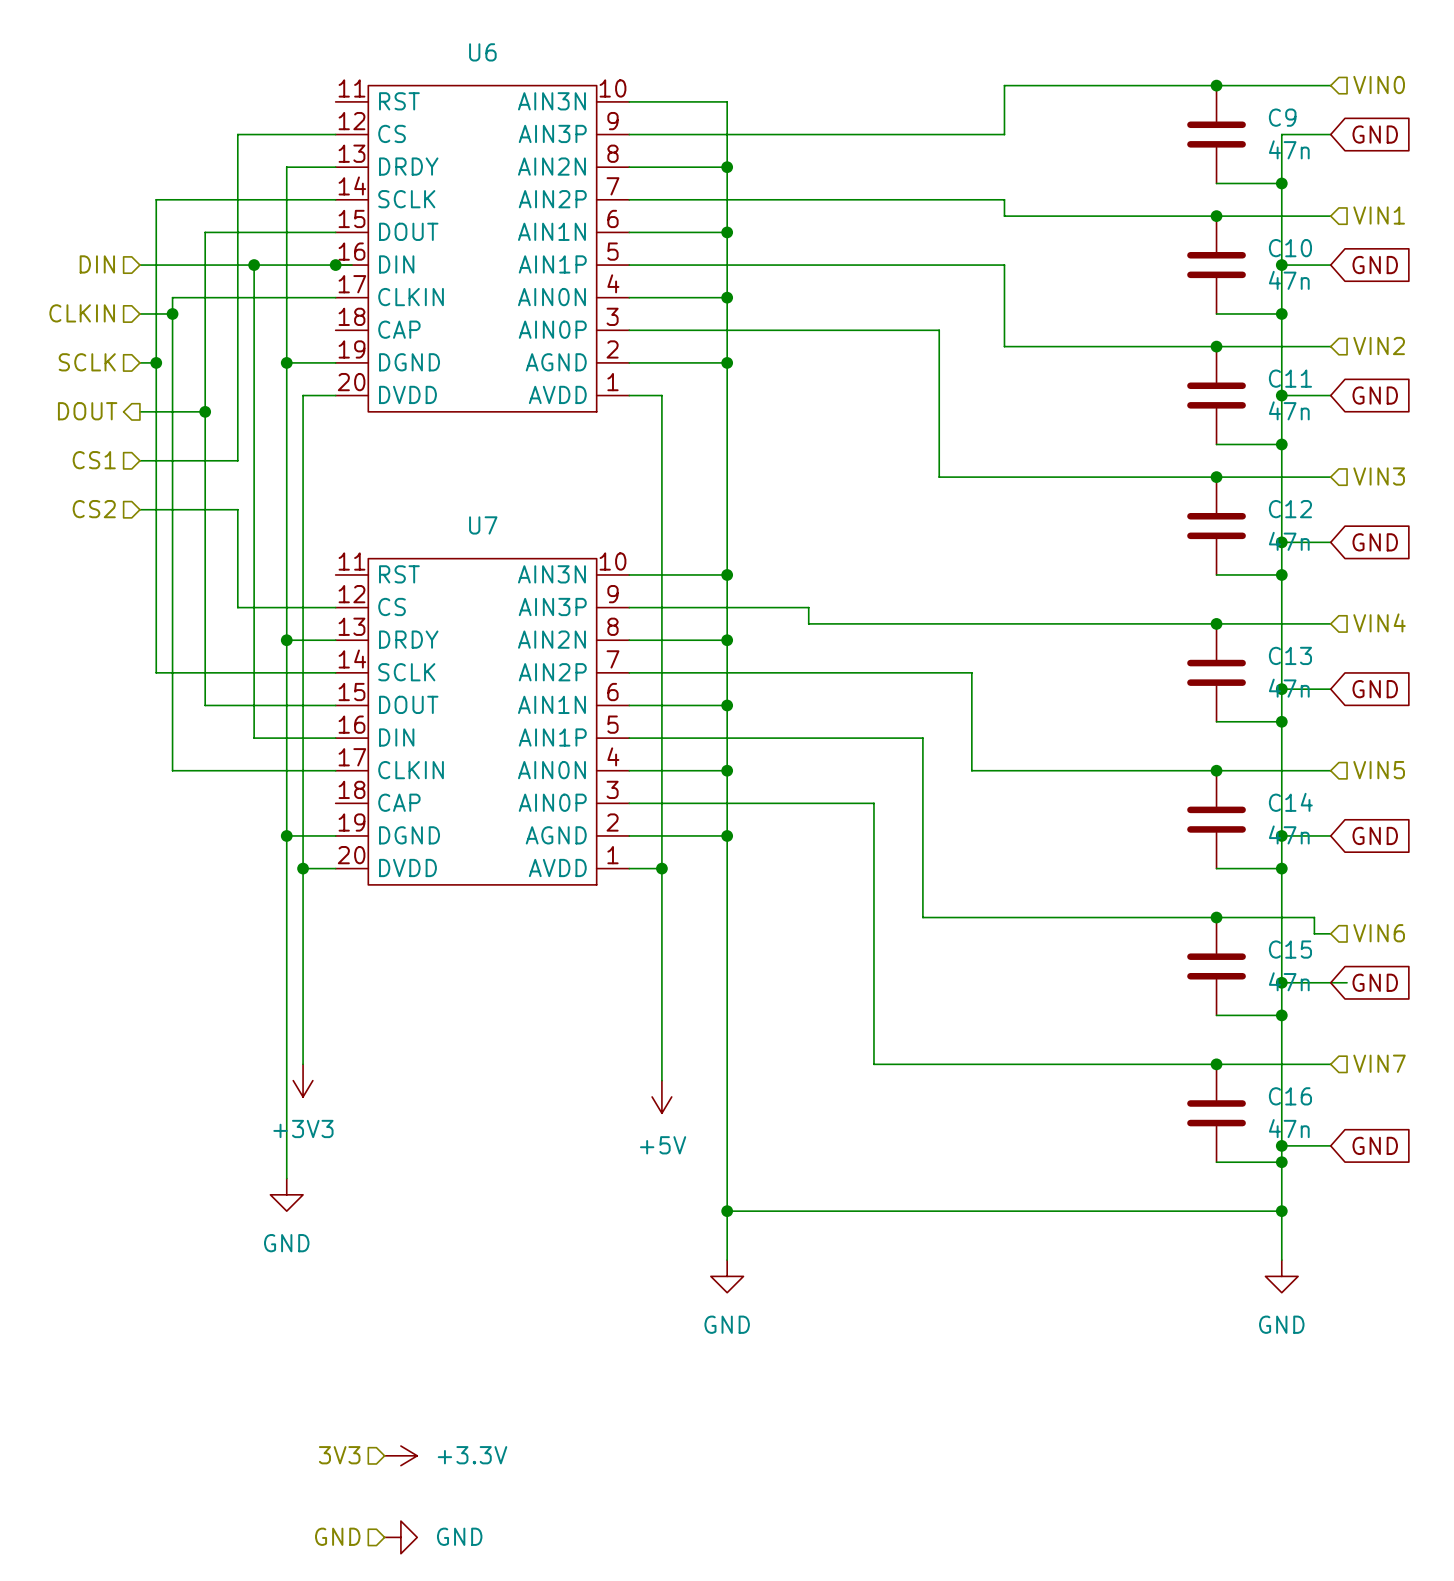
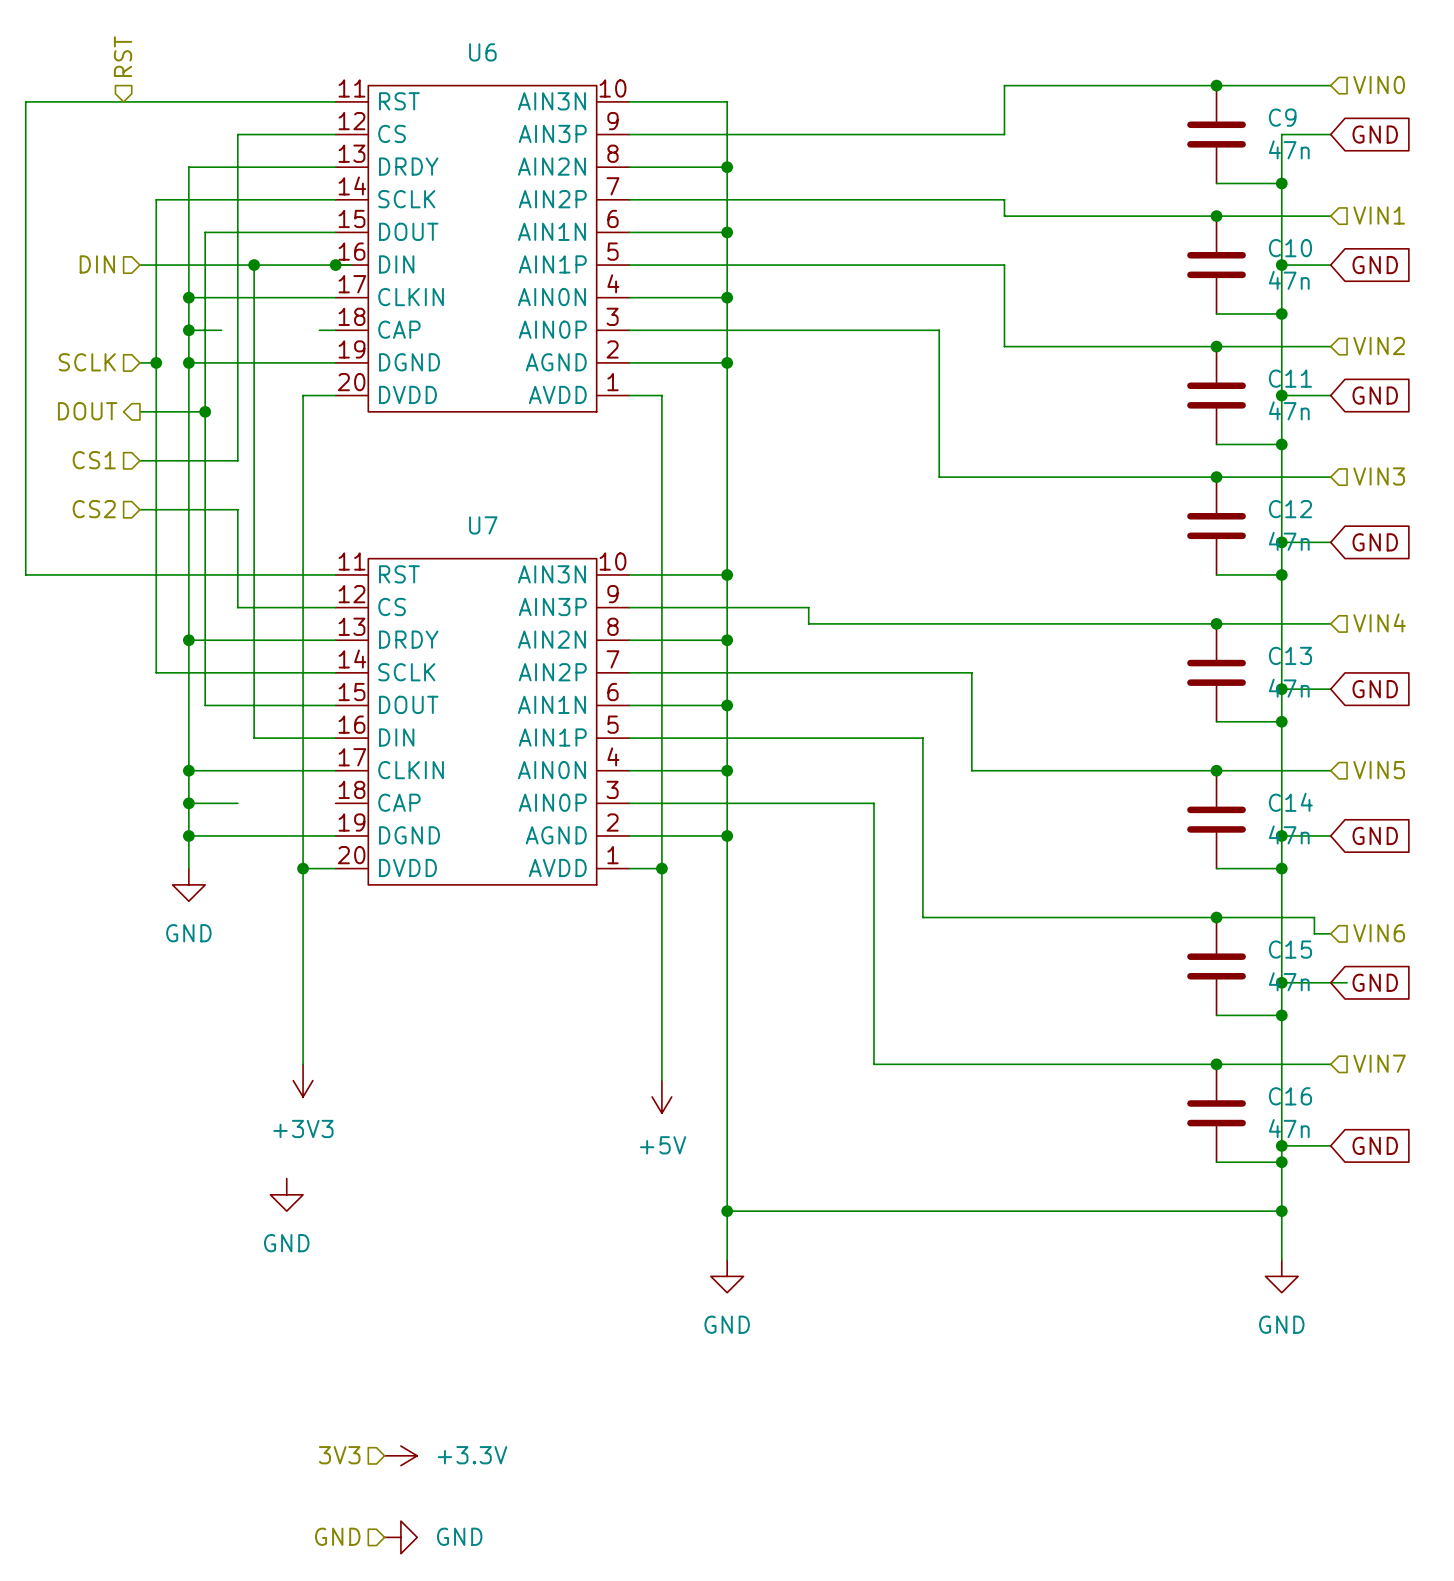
hierarchical label: none -> RST (123, 56)
wire: none -> (335, 101) (25, 101) (25, 574) (335, 574)
wire: (286, 167) (286, 1178) -> (286, 167) (188, 167) (188, 868)
wire: (188, 297) (172, 297) (172, 770) (188, 770) -> none
junction: none -> (188, 297)
hierarchical label: CLKIN (82, 313) -> none
wire: (139, 313) (172, 313) -> (188, 330) (221, 330)
junction: (172, 313) -> none
junction: none -> (188, 330)
wire: none -> (319, 330) (335, 330)
wire: none -> (188, 362) (286, 362)
junction: none -> (188, 362)
junction: (286, 362) -> none
wire: none -> (188, 640) (286, 640)
junction: none -> (188, 640)
junction: (286, 640) -> none
junction: none -> (188, 770)
wire: none -> (188, 803) (237, 803)
junction: none -> (188, 803)
wire: none -> (188, 835) (286, 835)
junction: none -> (188, 835)
junction: (286, 835) -> none
power symbol: none -> GND (188, 884)

